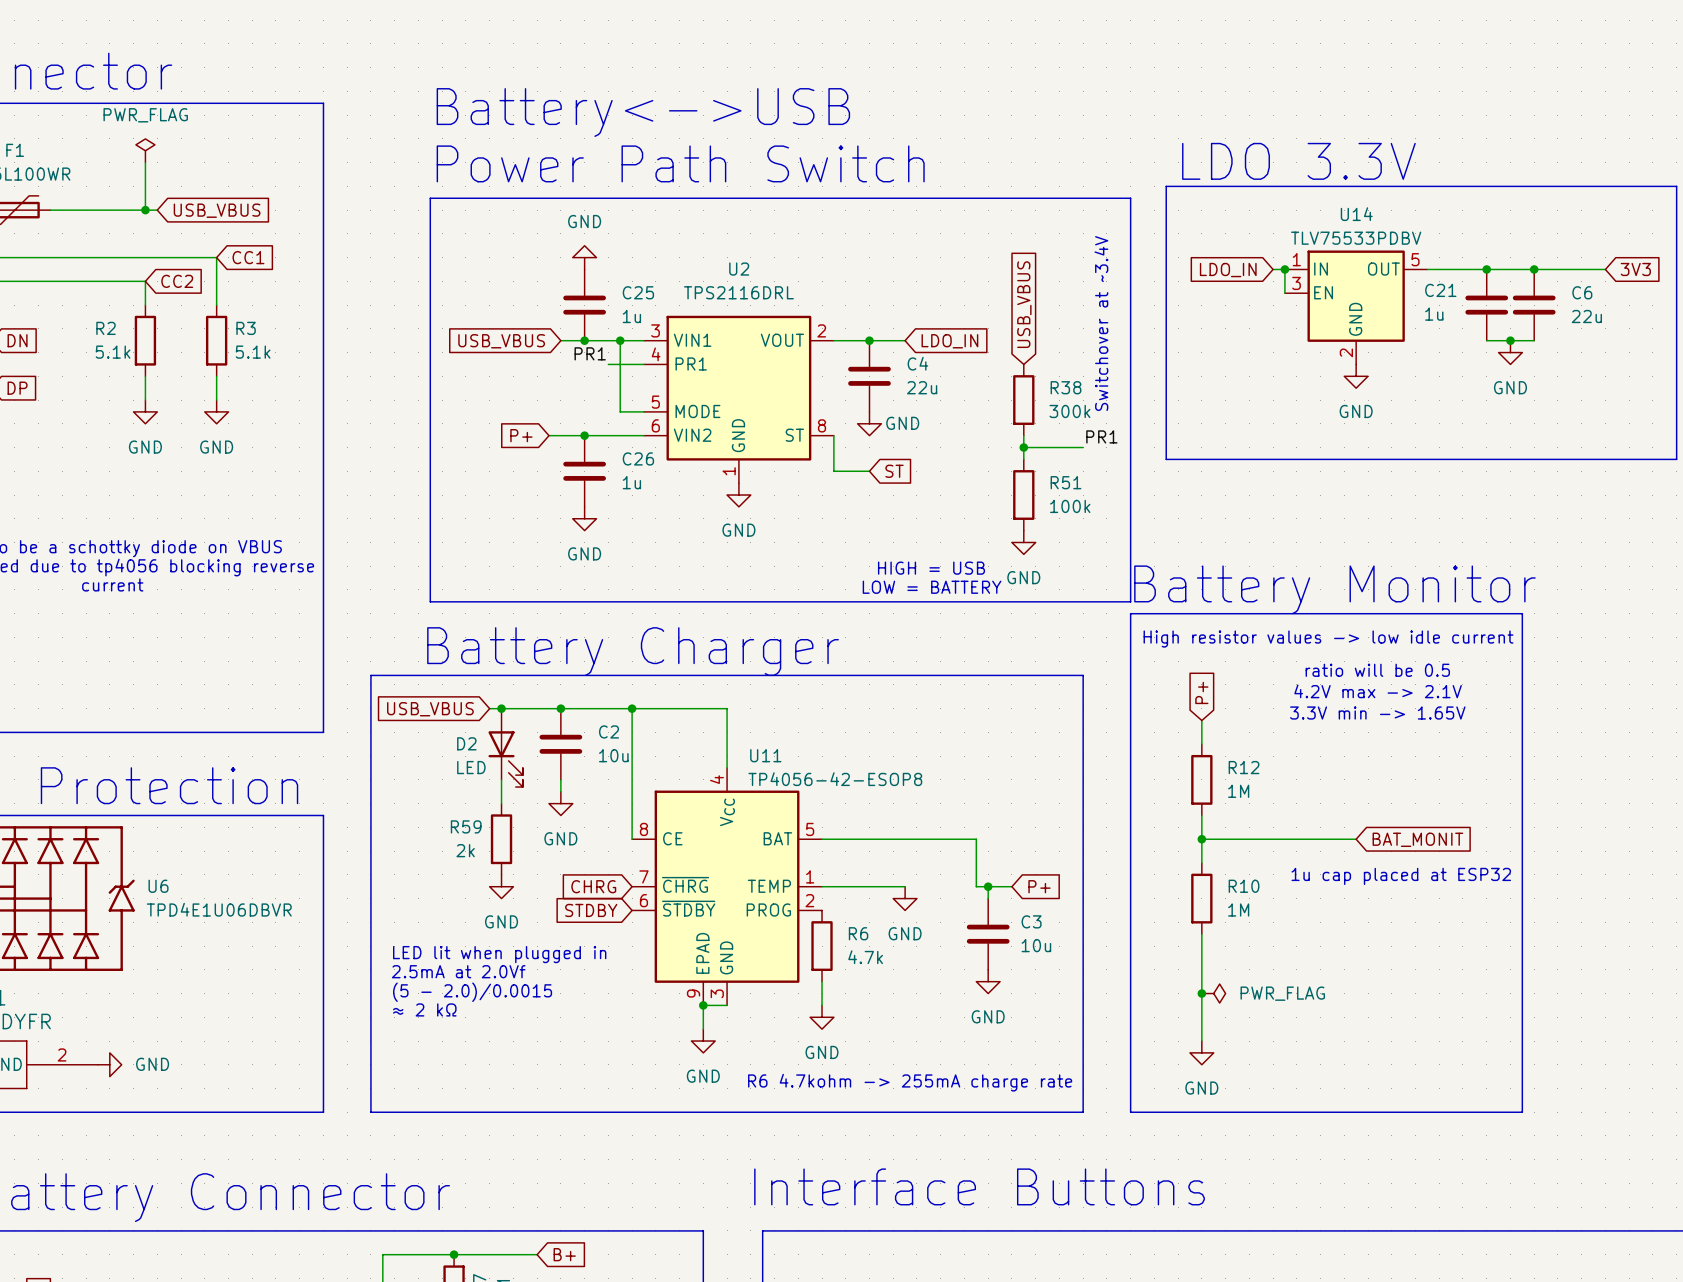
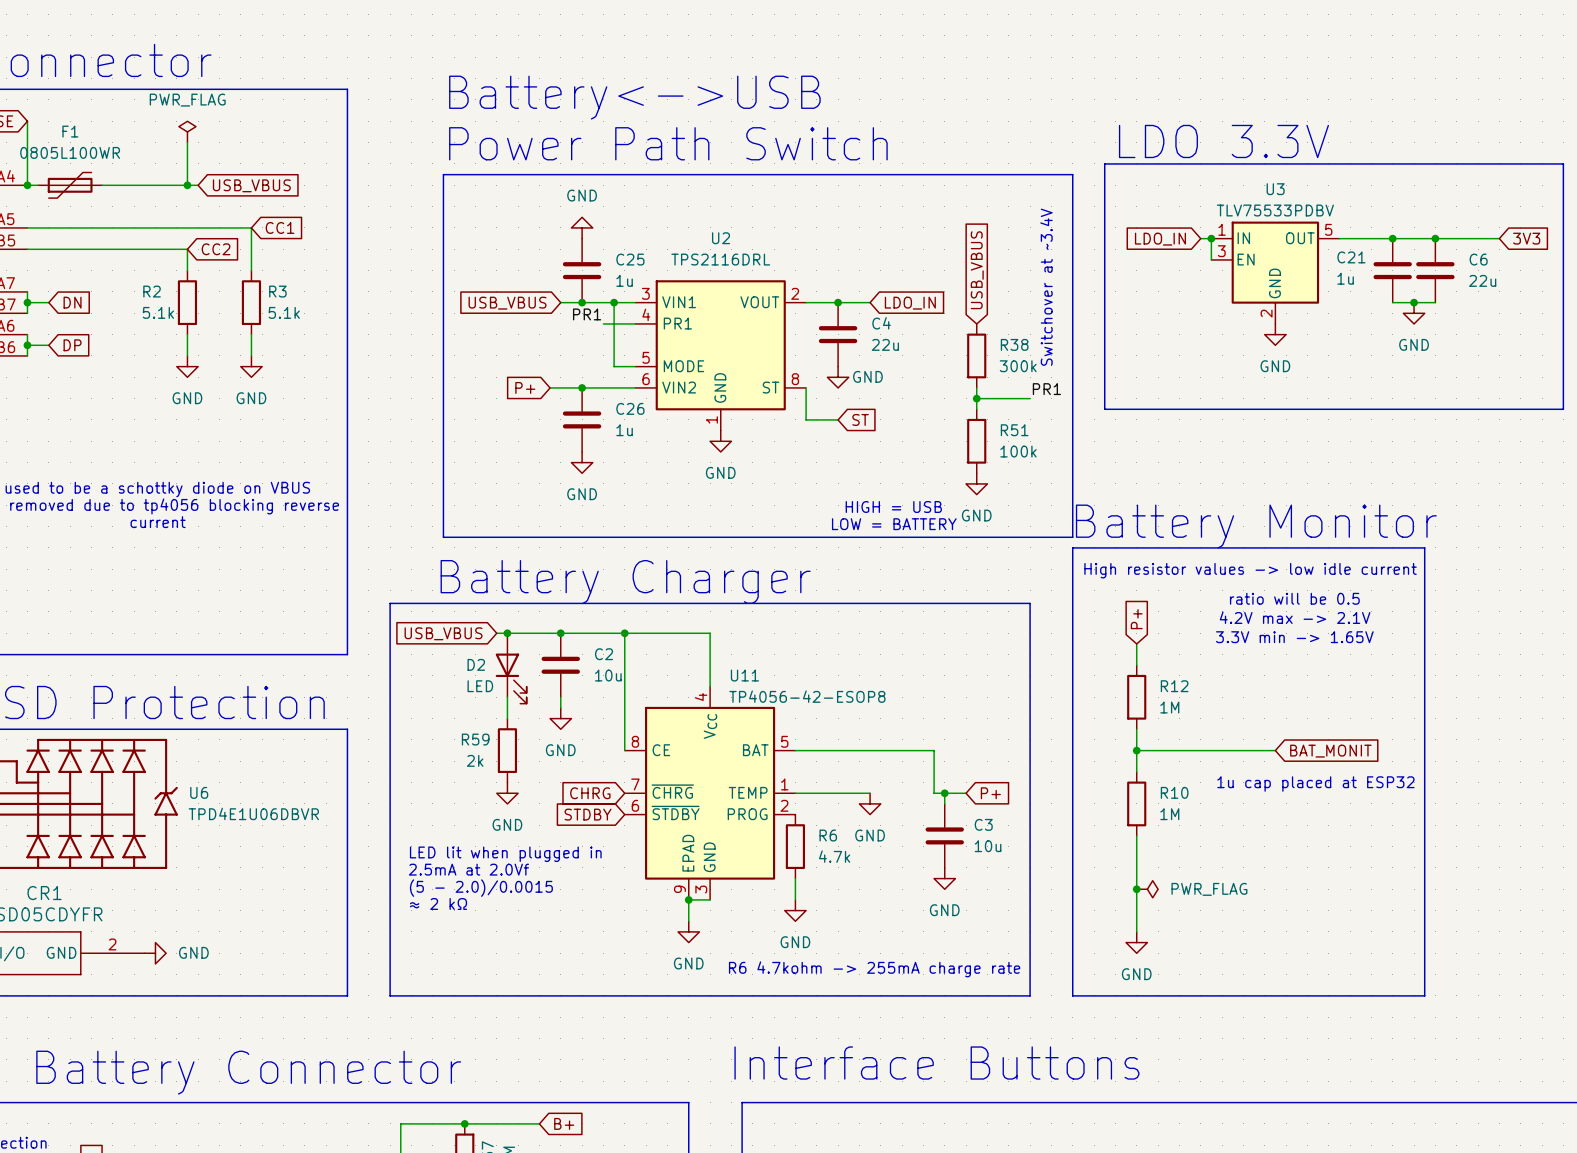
U14 name: U14 (1356, 214) -> U3 (1275, 189)

